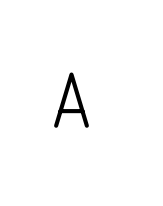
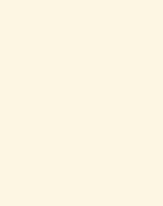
text: A (71, 100) -> none

